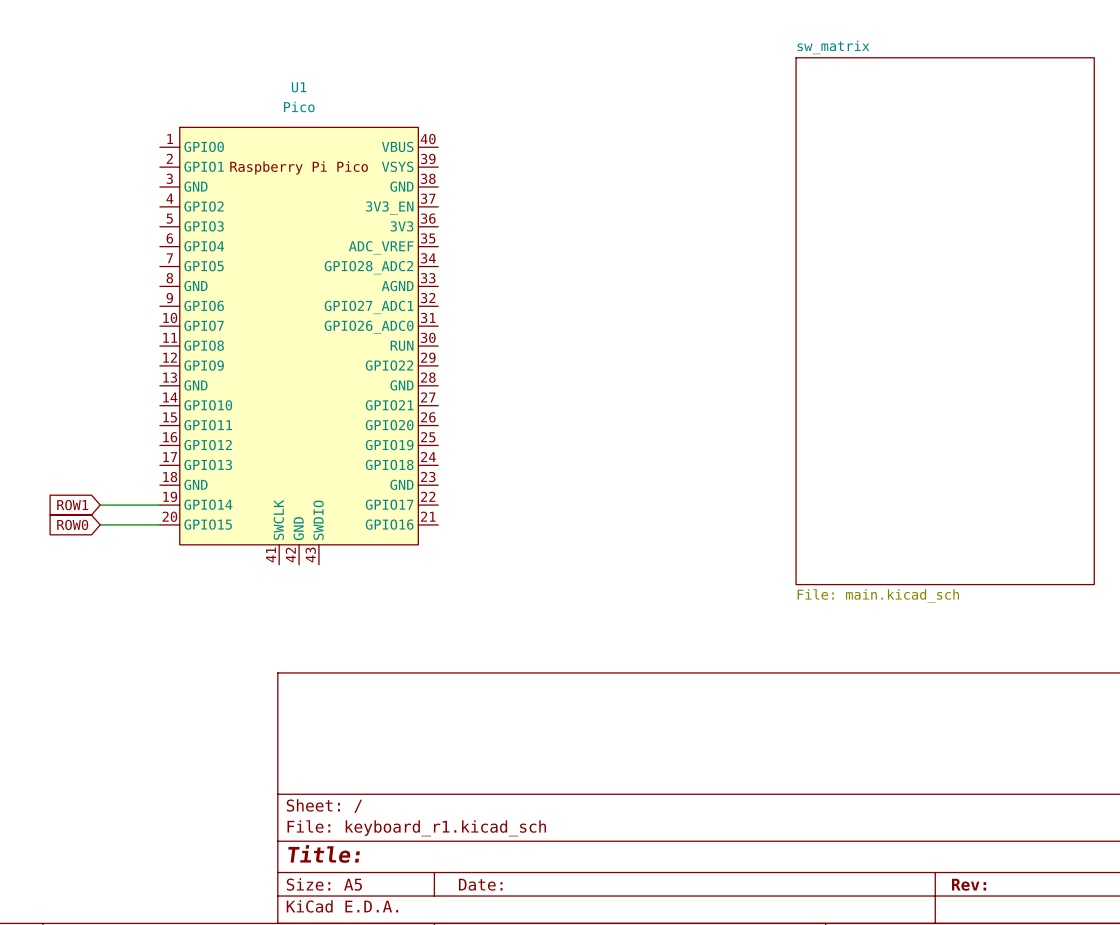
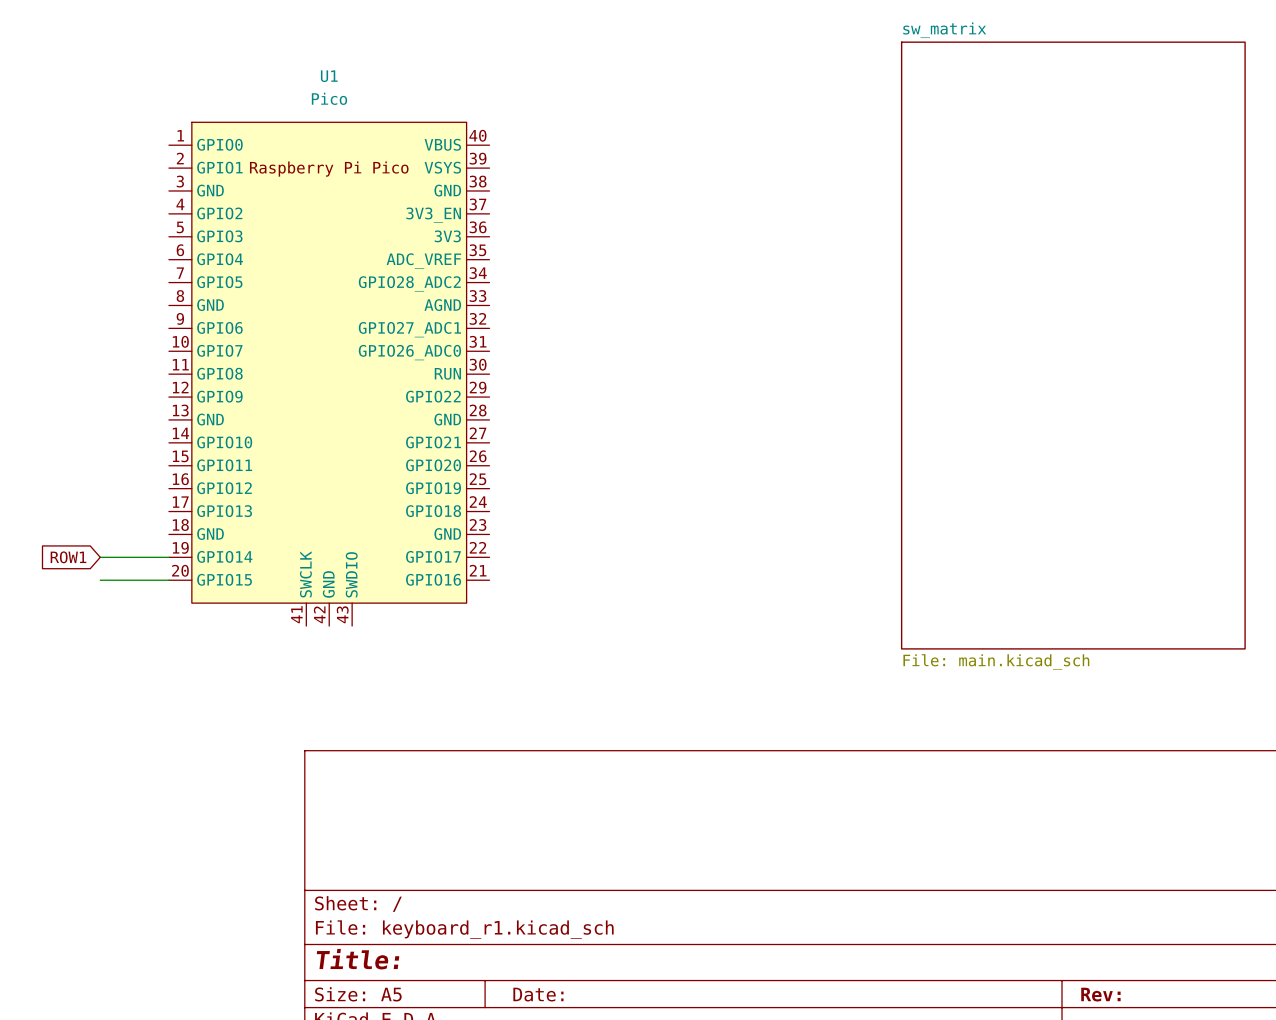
global label: ROW0 (72, 524) -> none

